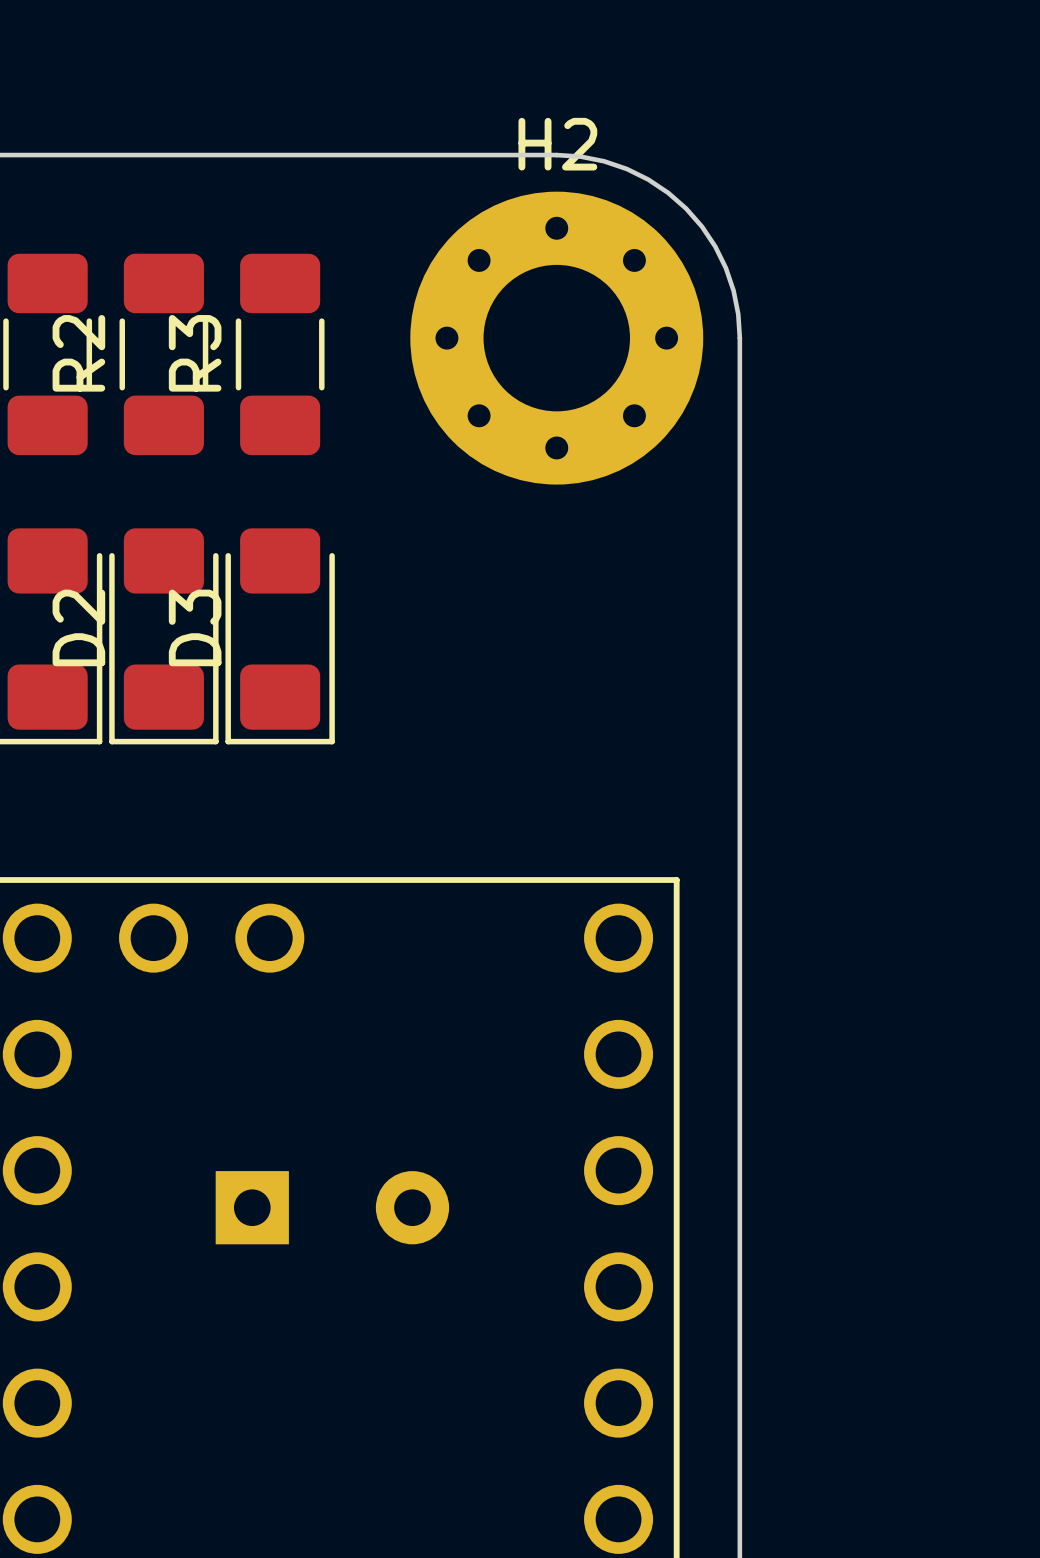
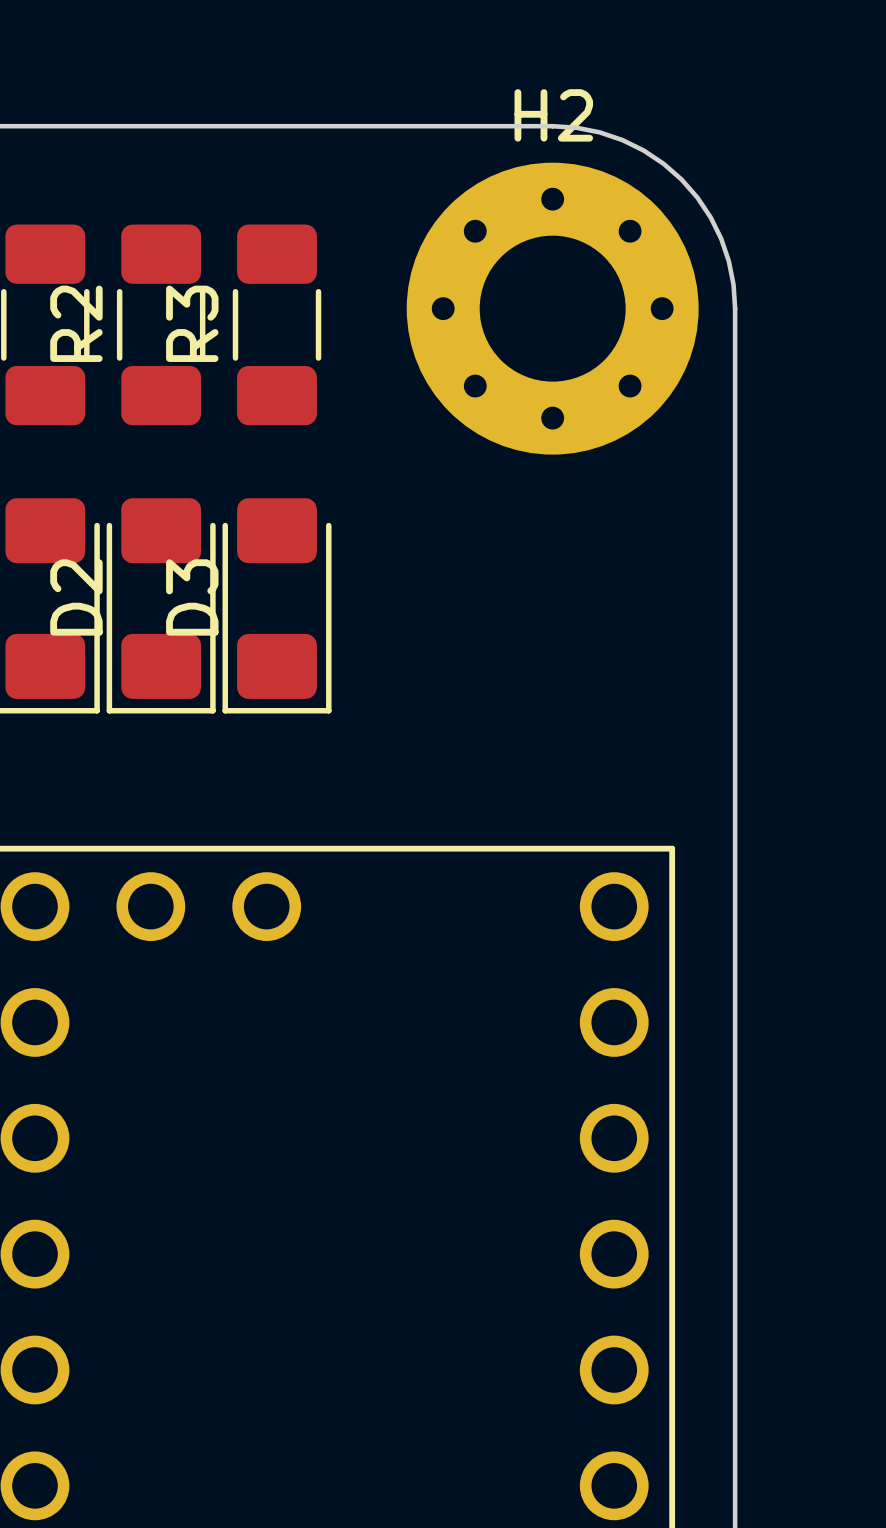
part: (332, 1207) -> none

